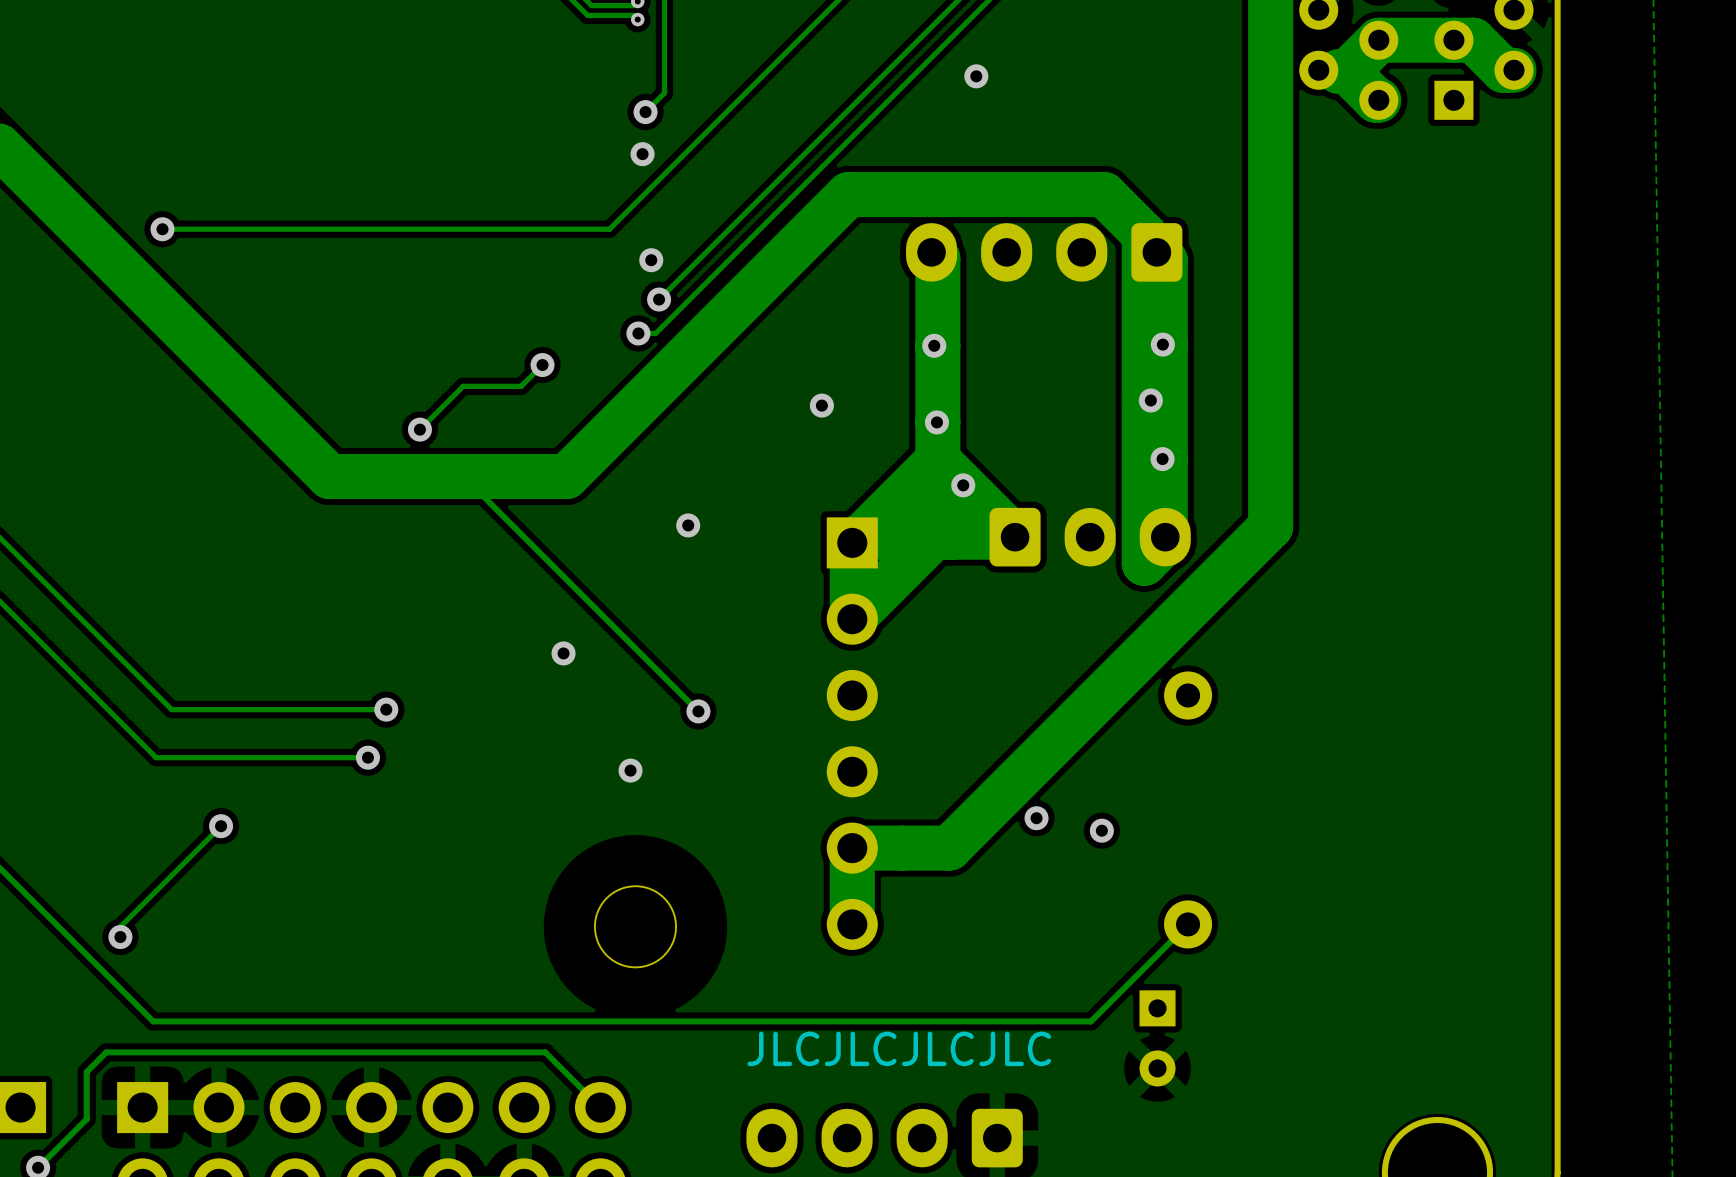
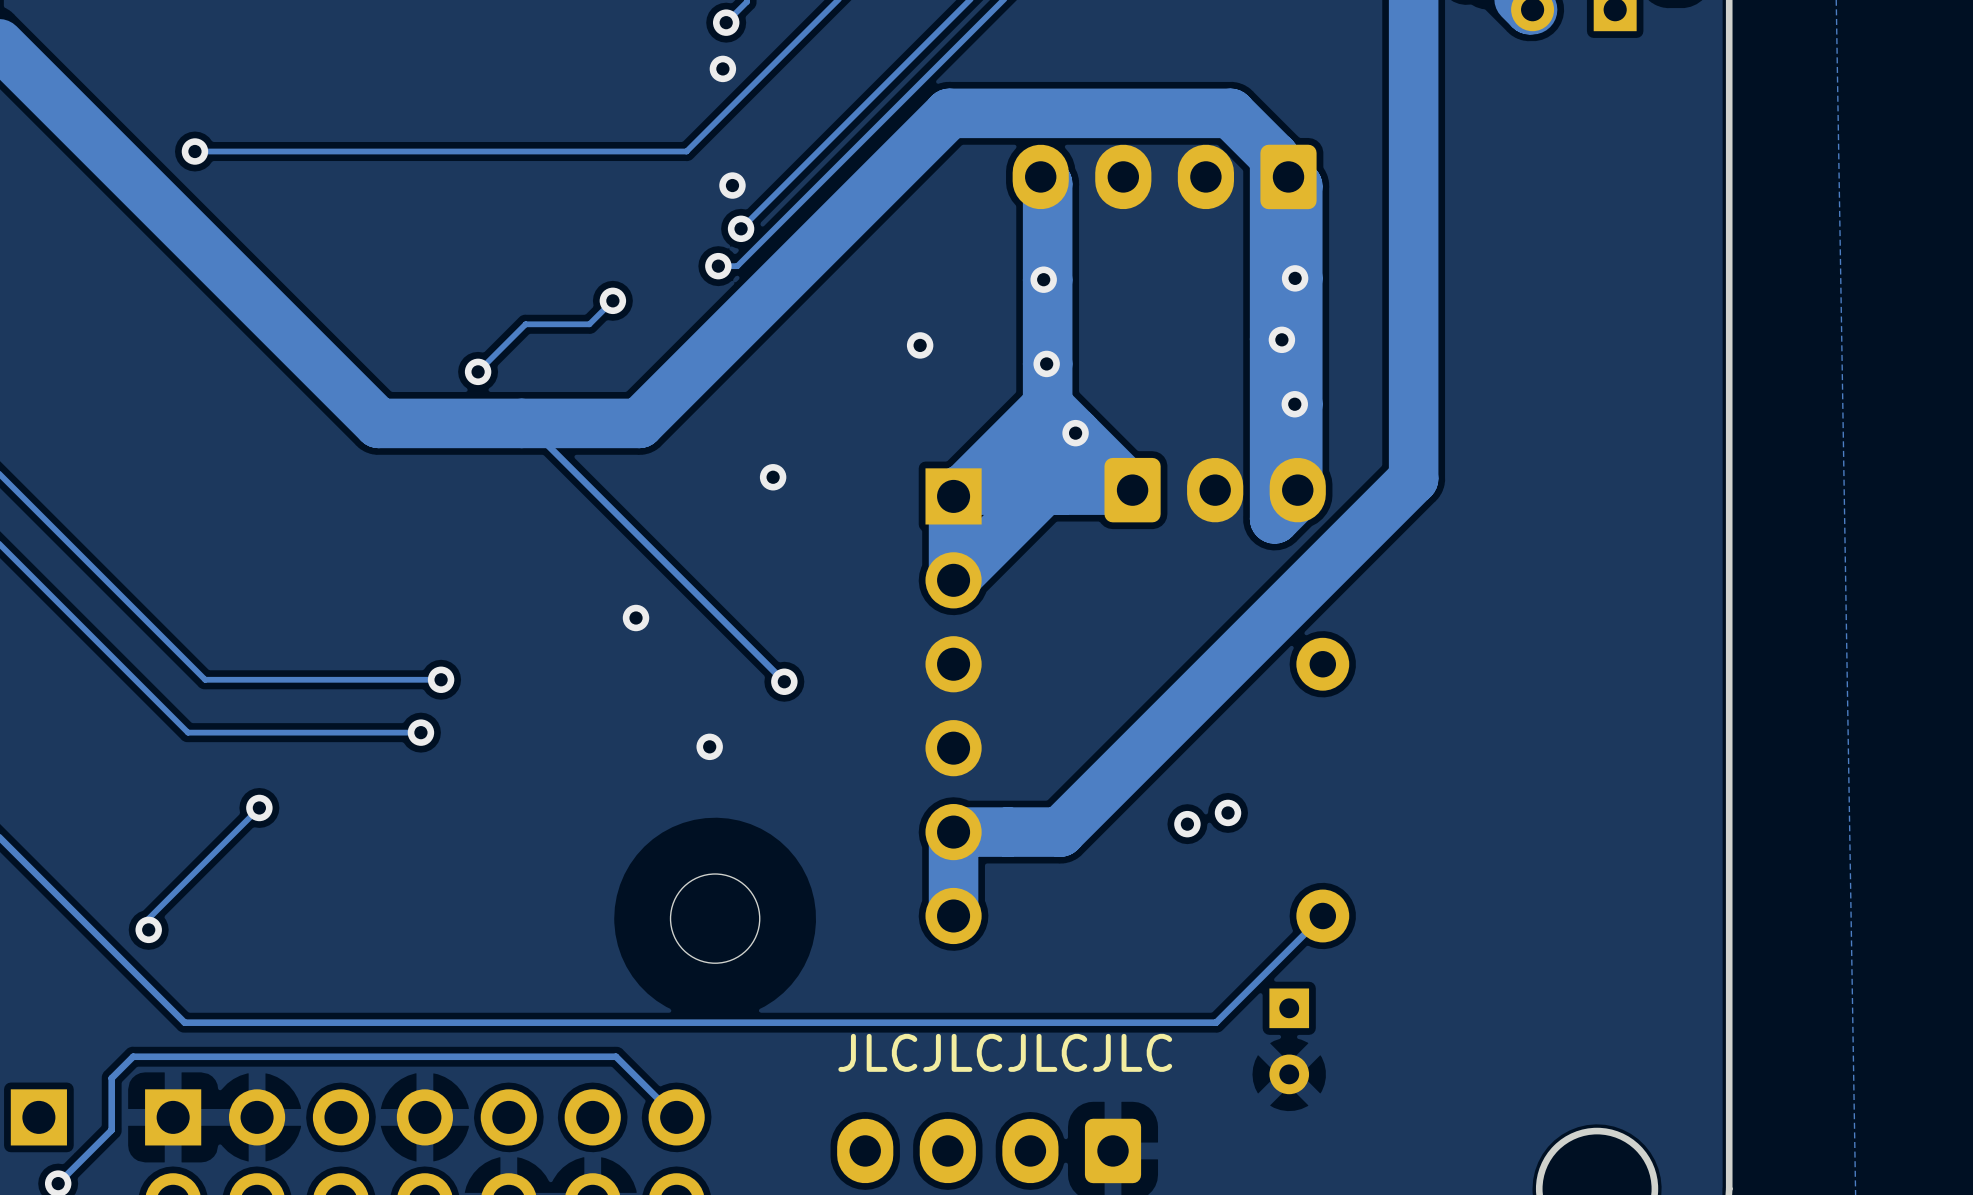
via position: (1036, 818) -> (1187, 824)

